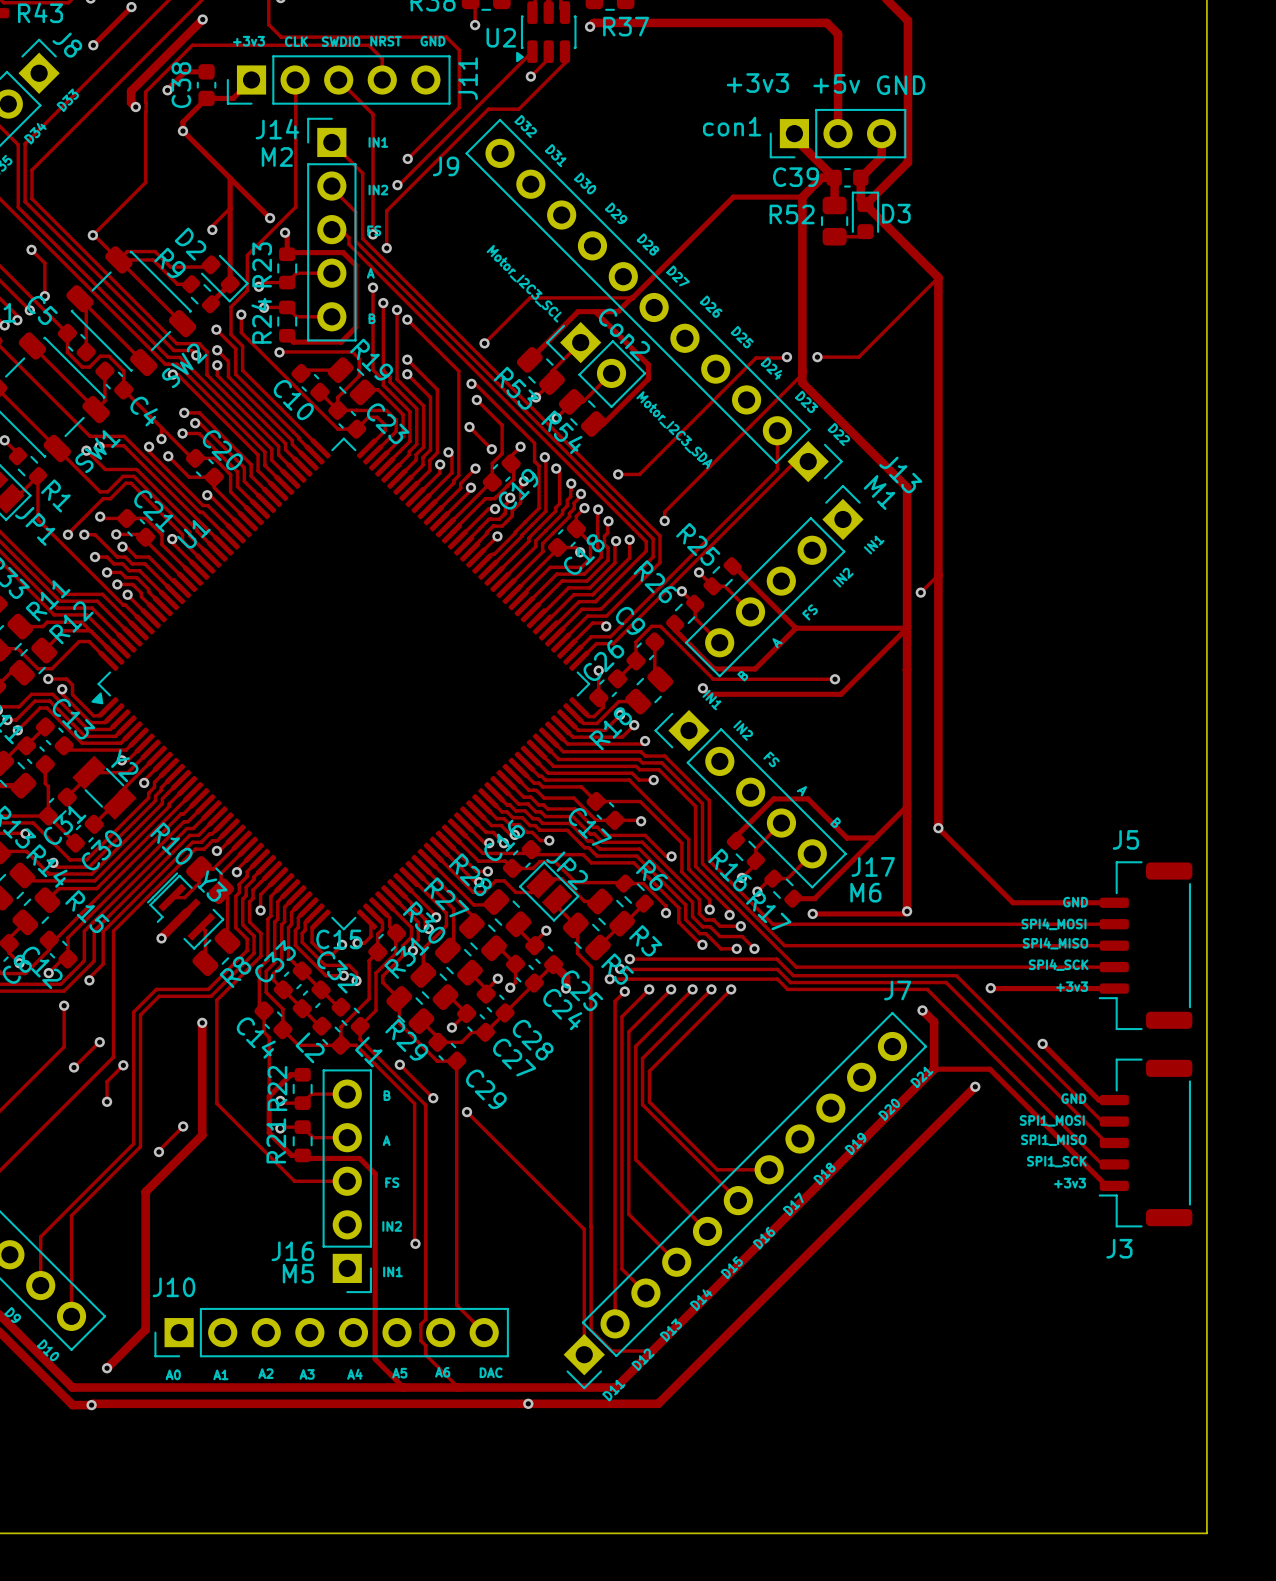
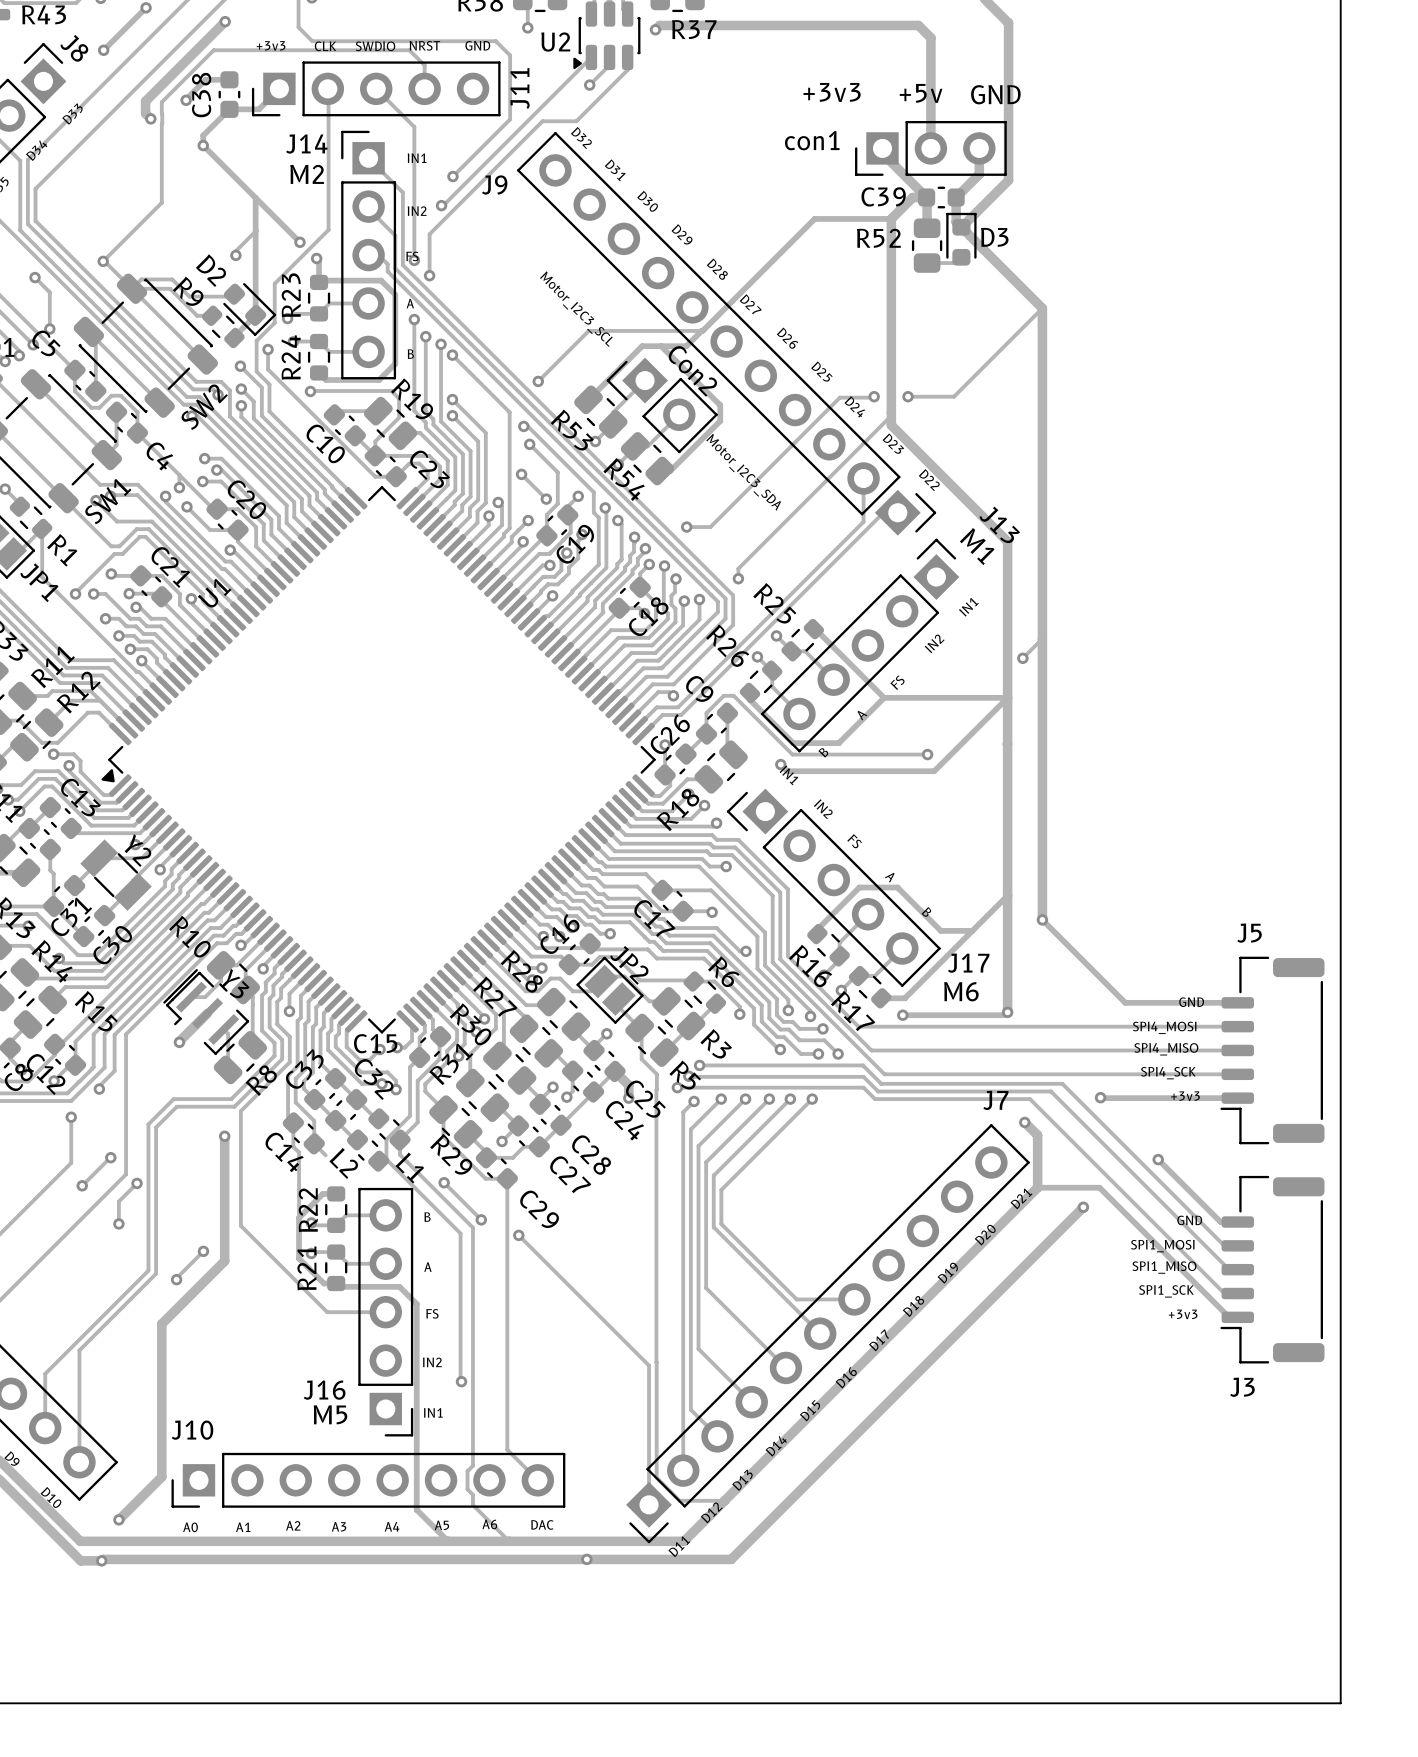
track: (369, 998) (340, 1027) (340, 1045) -> none
track: (293, 1040) (298, 1045) (356, 1045) (414, 1103) (414, 1110) -> (410, 1109) (410, 1115) (386, 1139) (386, 1159) (460, 1233)

